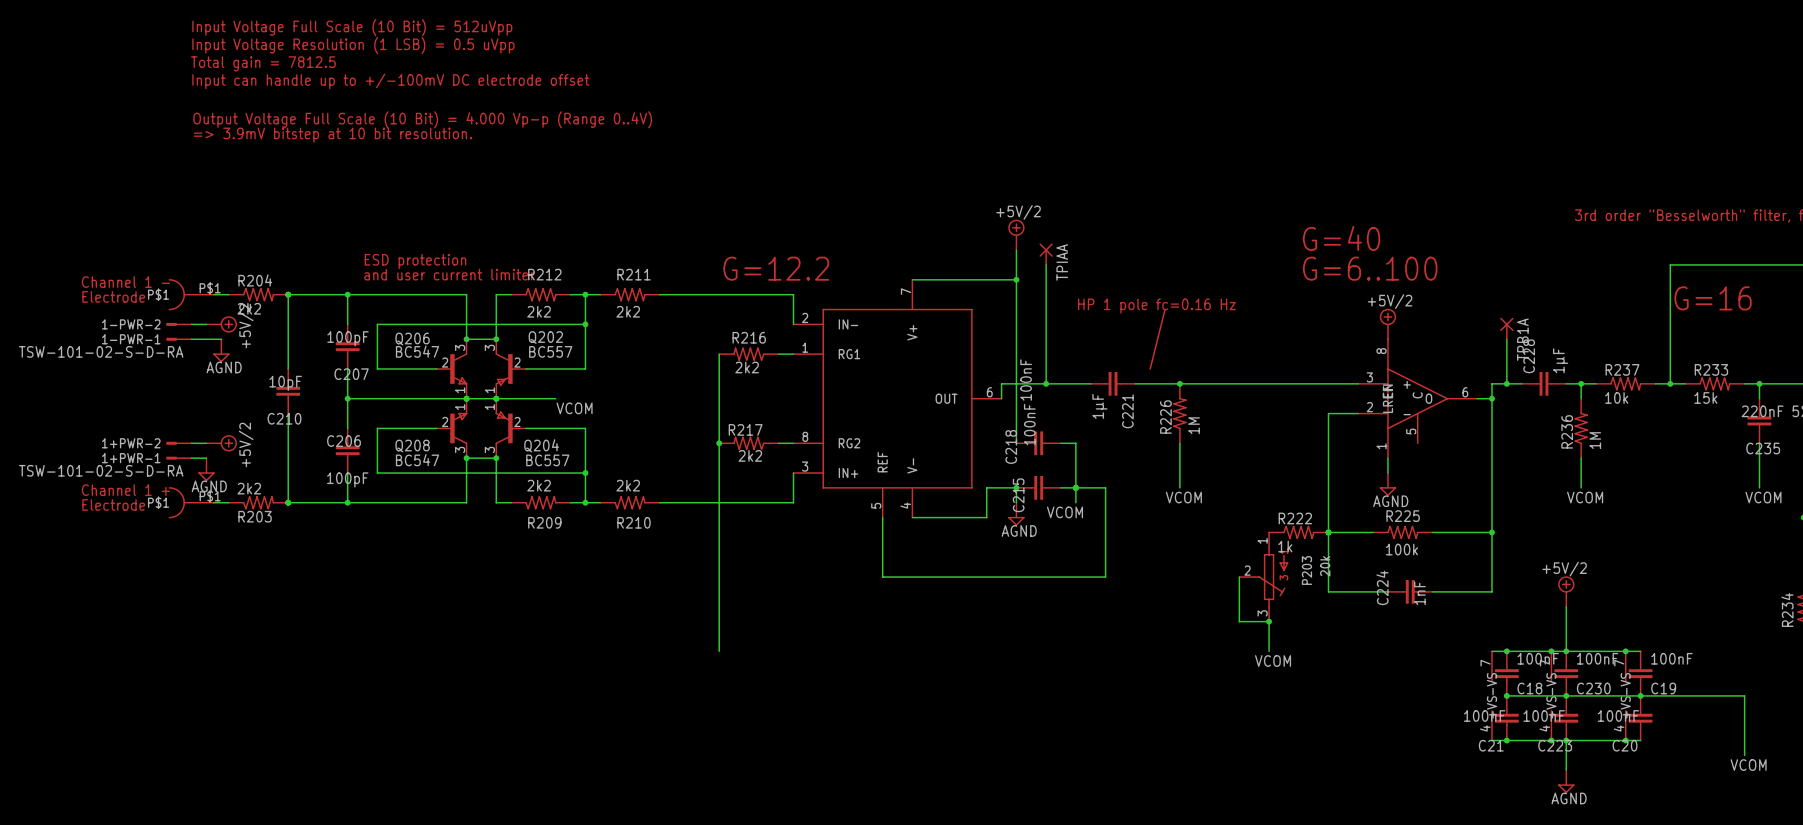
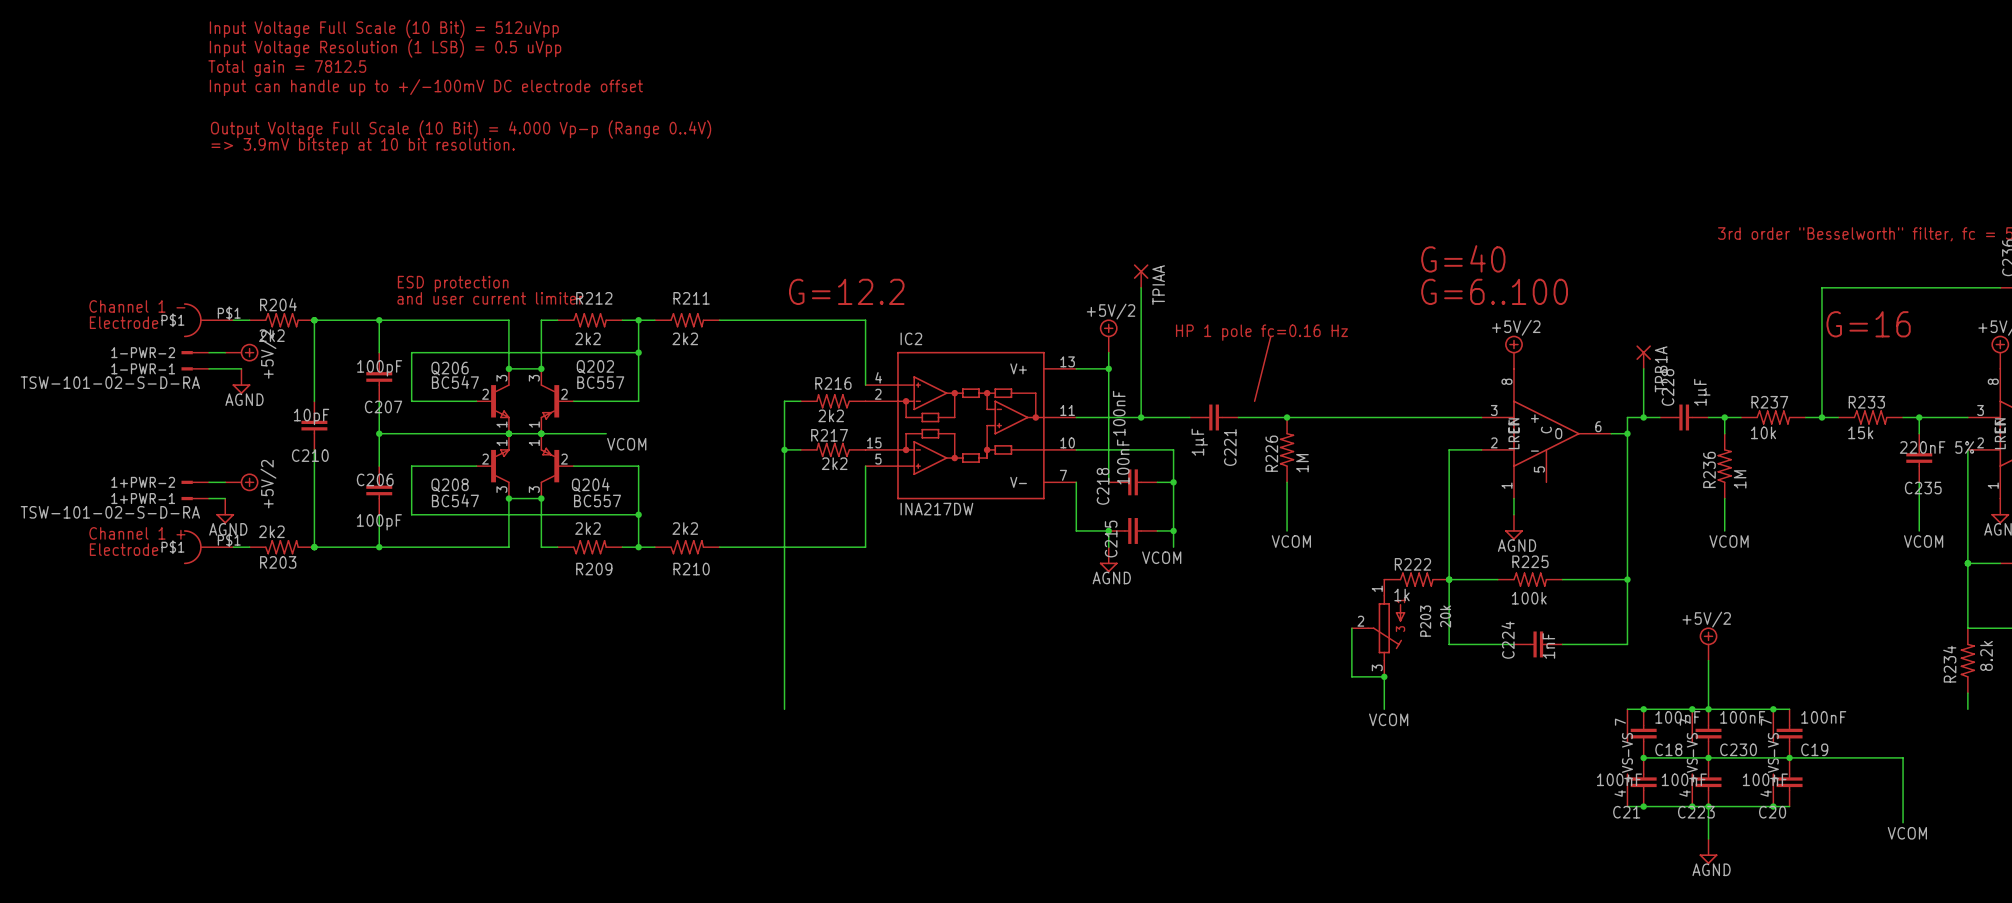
power symbol position: +5V/2 (1016, 234) -> +5V/2 (1108, 336)
wire: (1016, 250) (1016, 324) -> none
wire: (912, 279) (1016, 279) -> none
junction: (1016, 279) -> none
wire: none -> (1076, 368) (1108, 368)
junction: none -> (1108, 368)
wire: (719, 354) (719, 368) -> (800, 401) (784, 401)
R216 position: (748, 354) -> (833, 401)
wire: (778, 354) (793, 354) -> (865, 352) (865, 385)
wire: (1001, 383) (1001, 398) -> (1092, 417) (1076, 417)
IC2: none -> INA217DW (970, 425)
part: (897, 398) -> none
wire: none -> (1076, 449) (1173, 449) (1173, 482)
wire: none -> (865, 466) (865, 514)
junction position: (719, 443) -> (784, 449)
R217 position: (748, 443) -> (833, 449)
wire: (778, 443) (793, 443) -> (784, 449) (800, 449)
junction: none -> (1173, 482)
wire: (986, 487) (986, 517) (912, 517) -> (1076, 530) (1076, 482)
wire: (1075, 487) (1105, 487) (1105, 577) (882, 577) (882, 517) -> none

